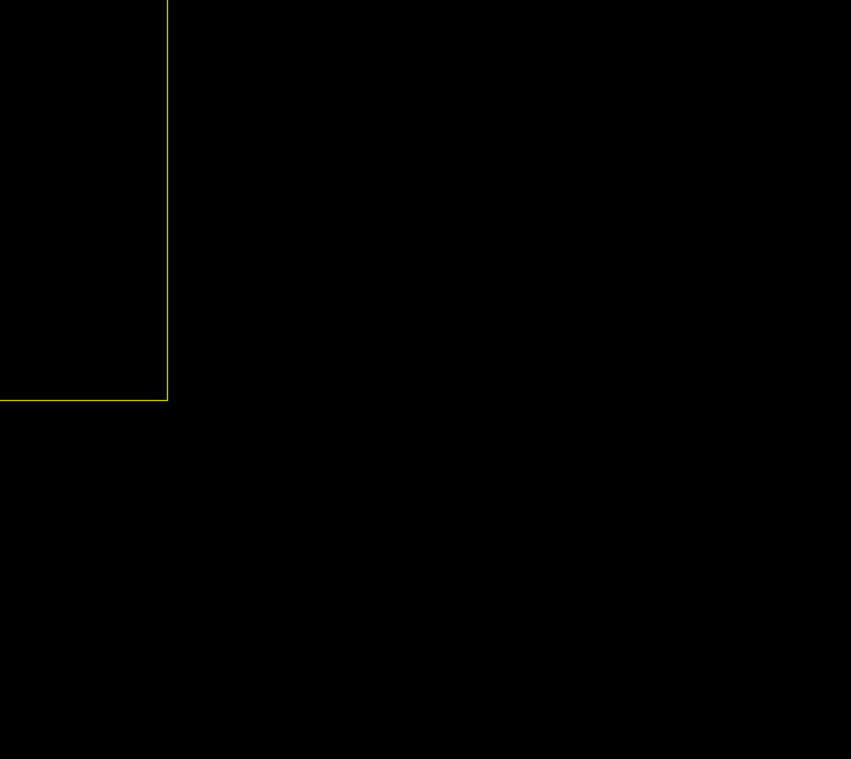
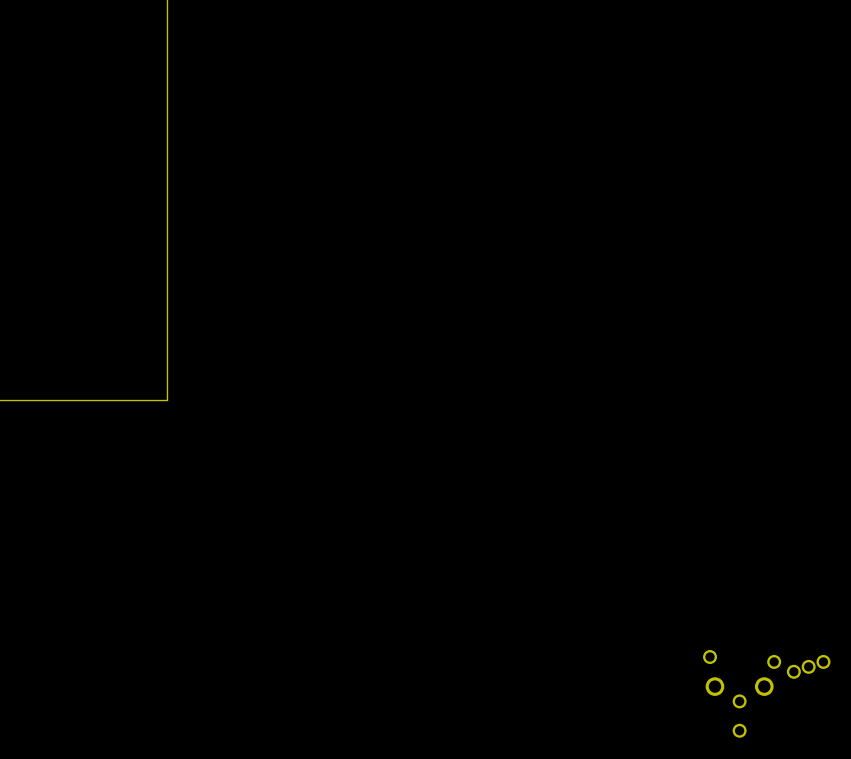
part: none -> (766, 693)

